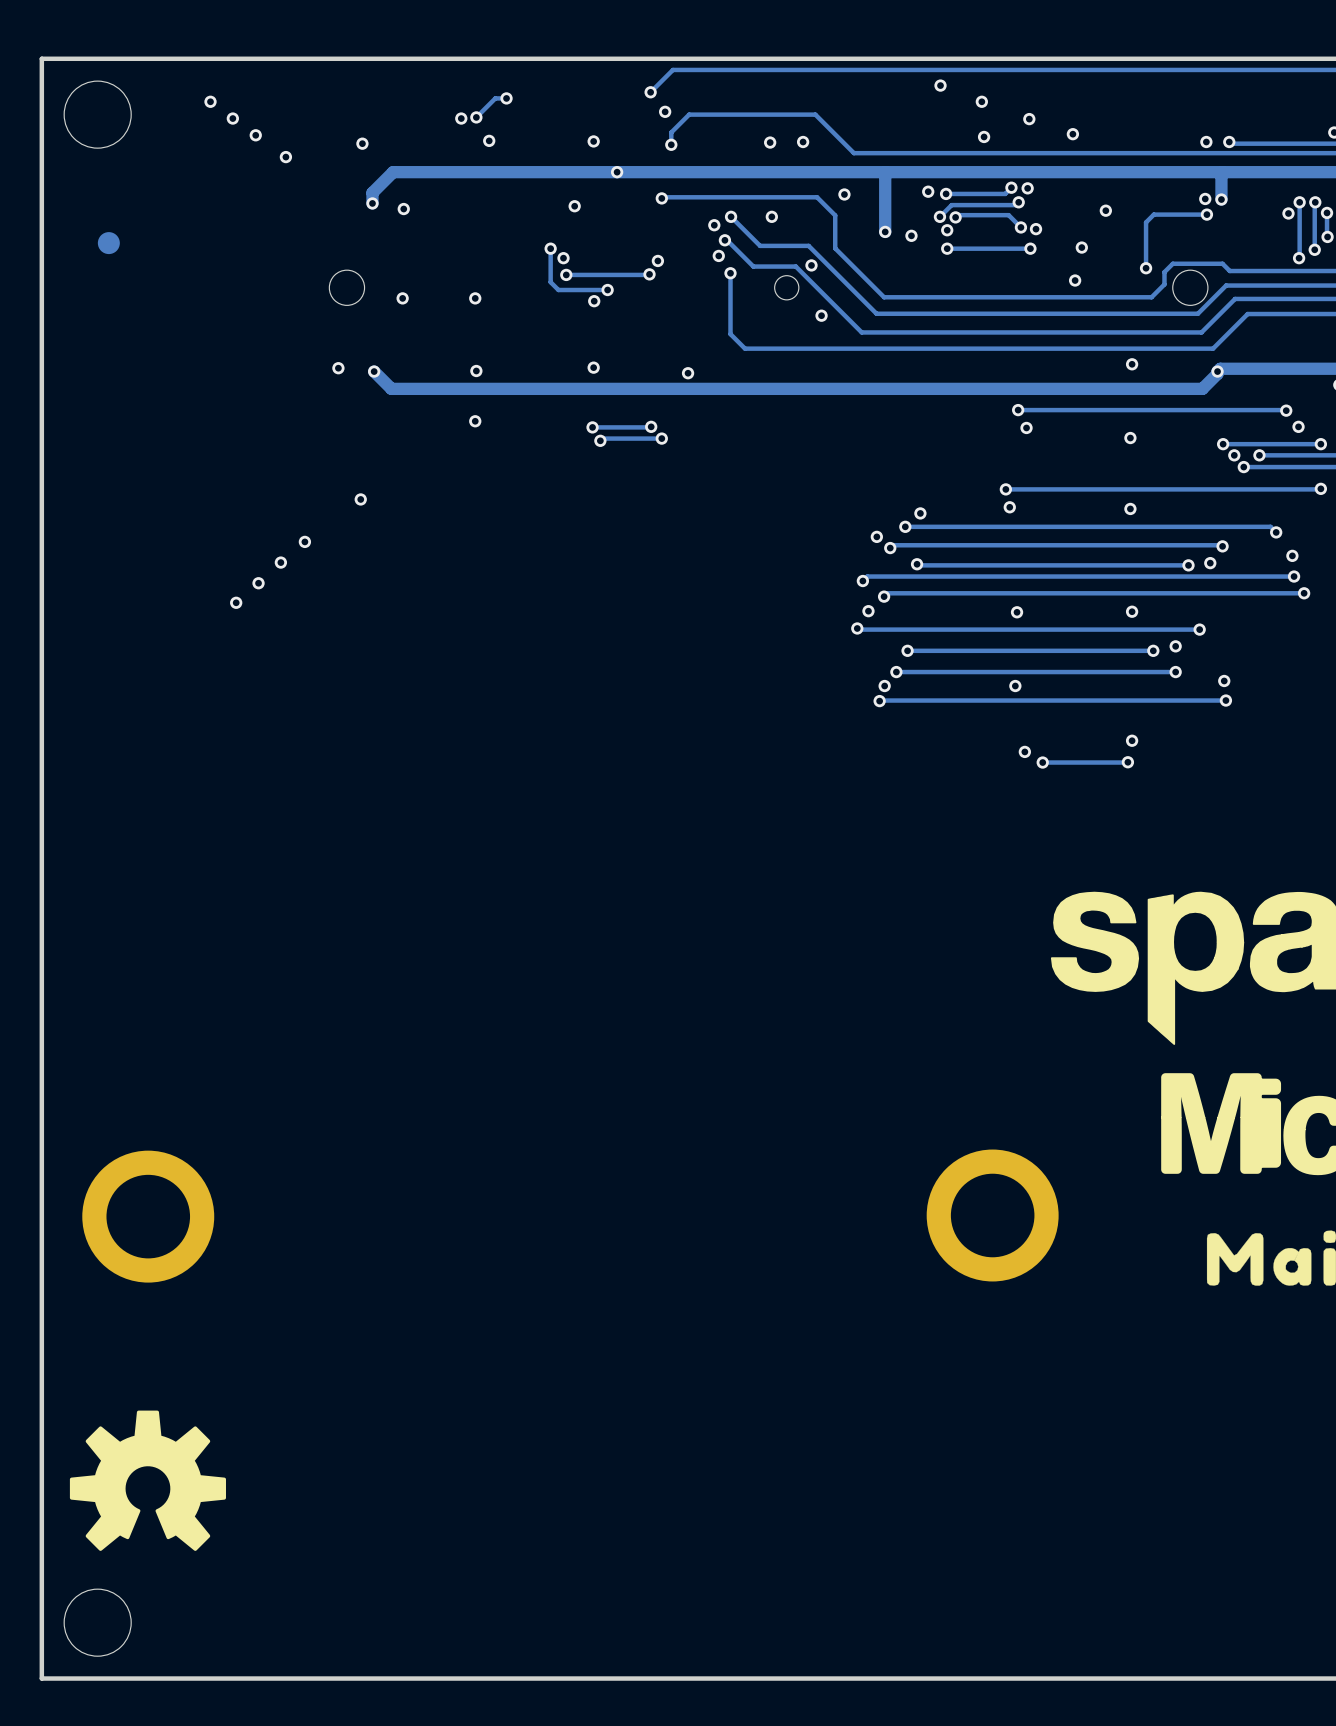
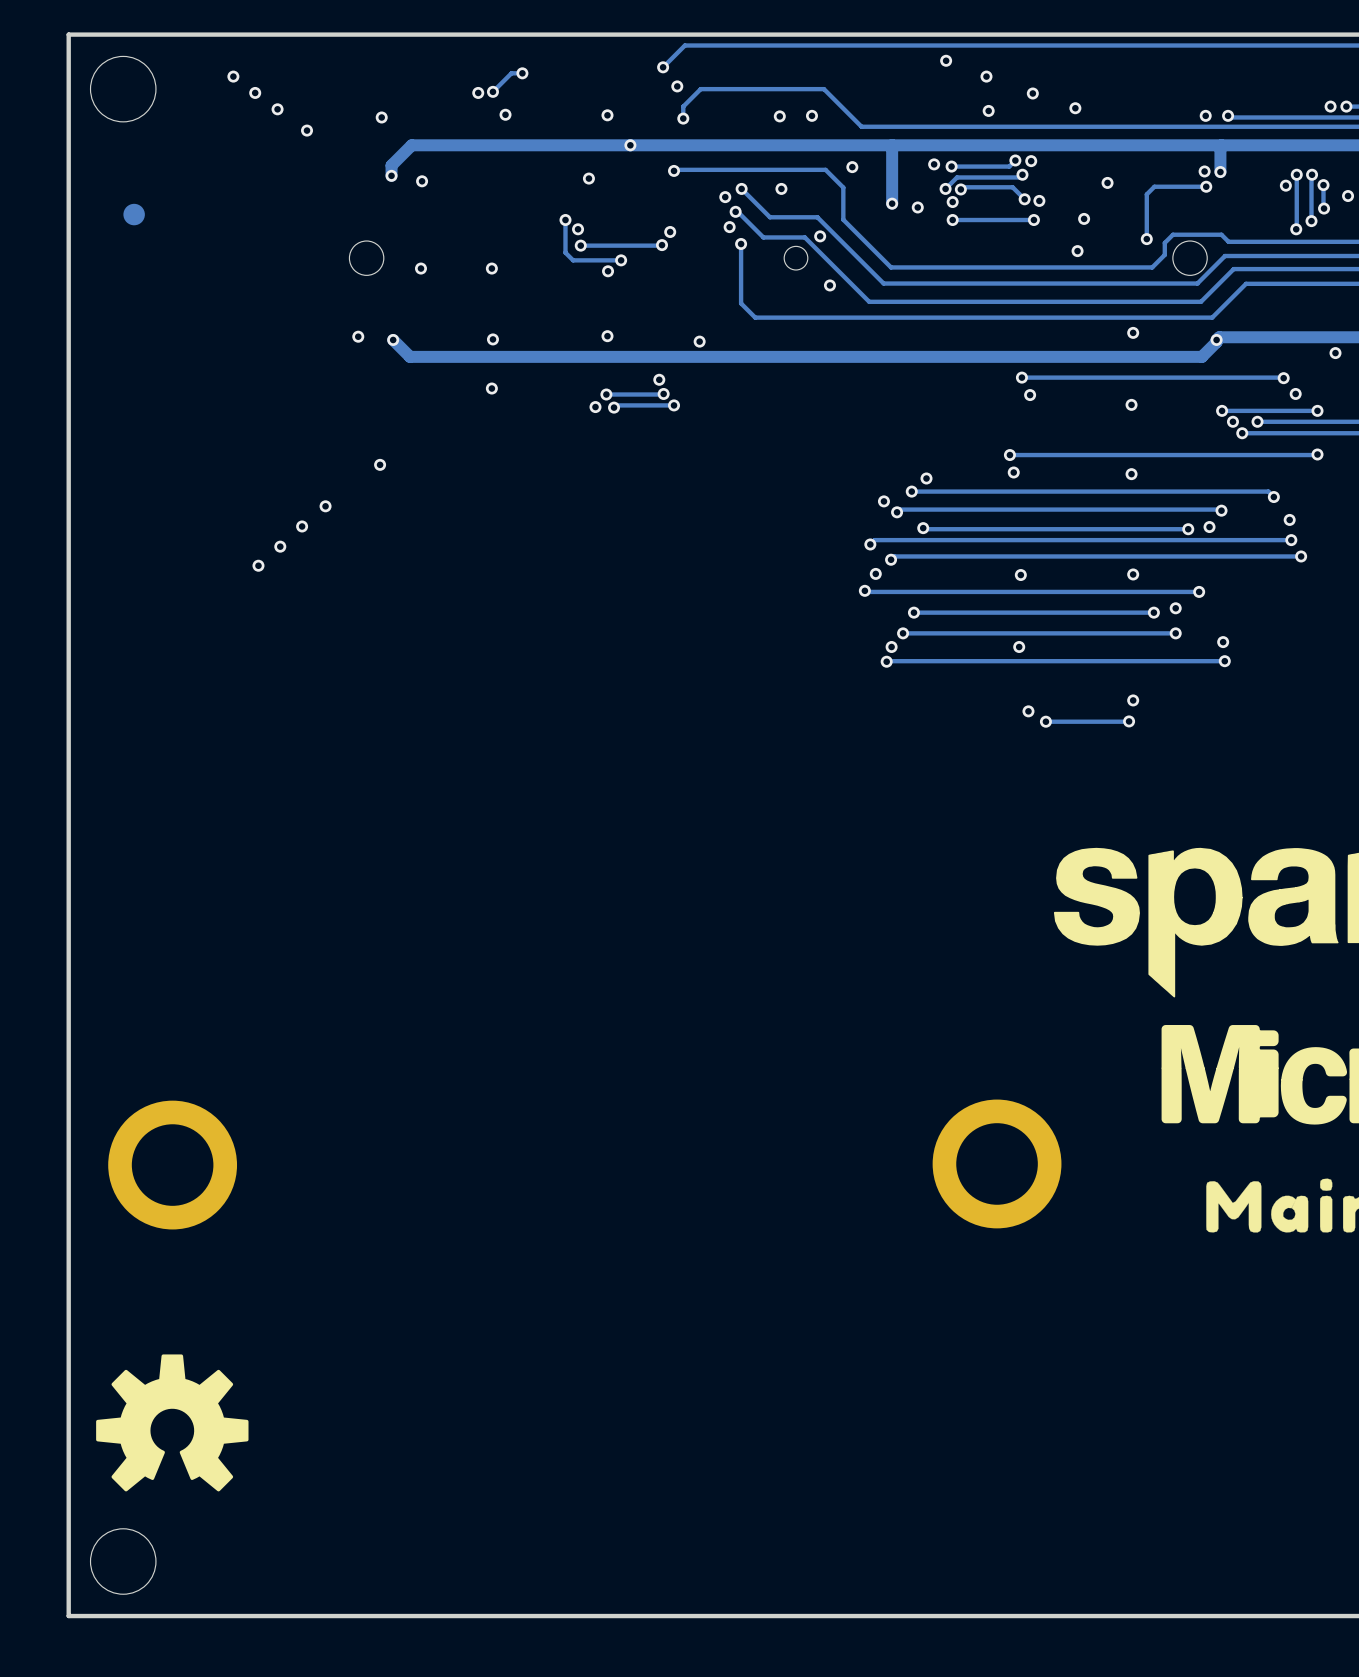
via: none -> (659, 379)
via: none -> (595, 407)

